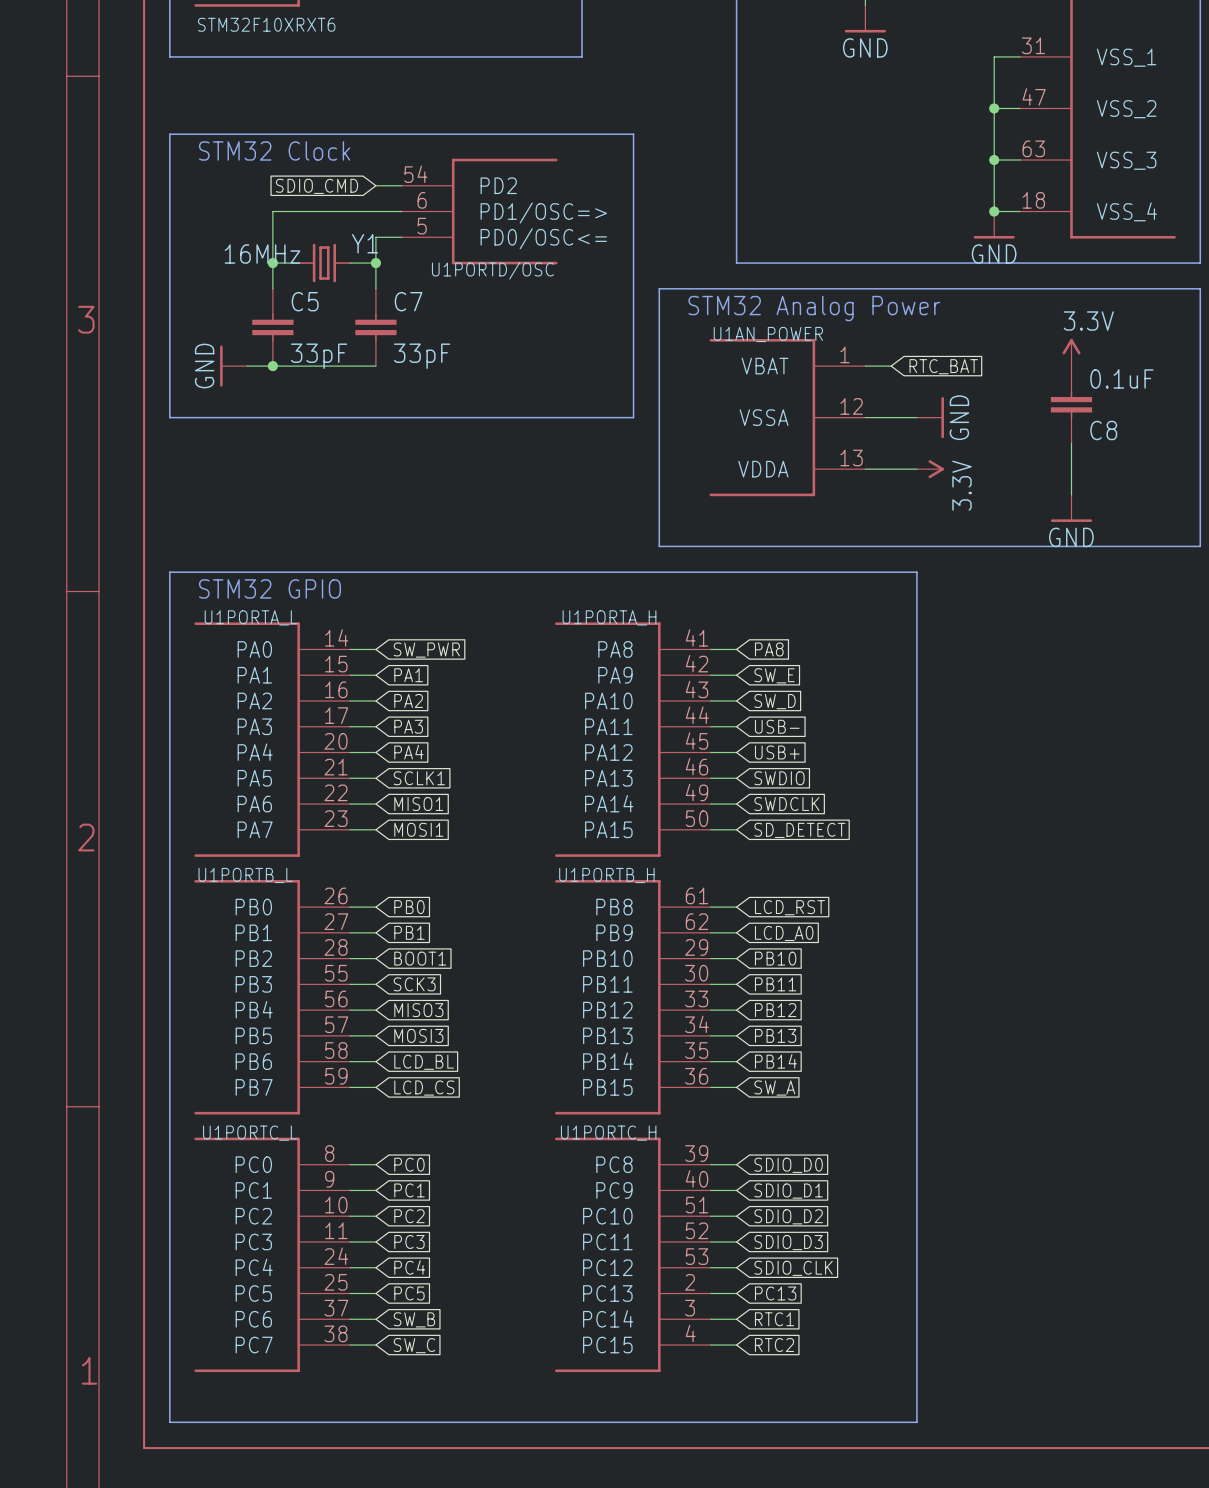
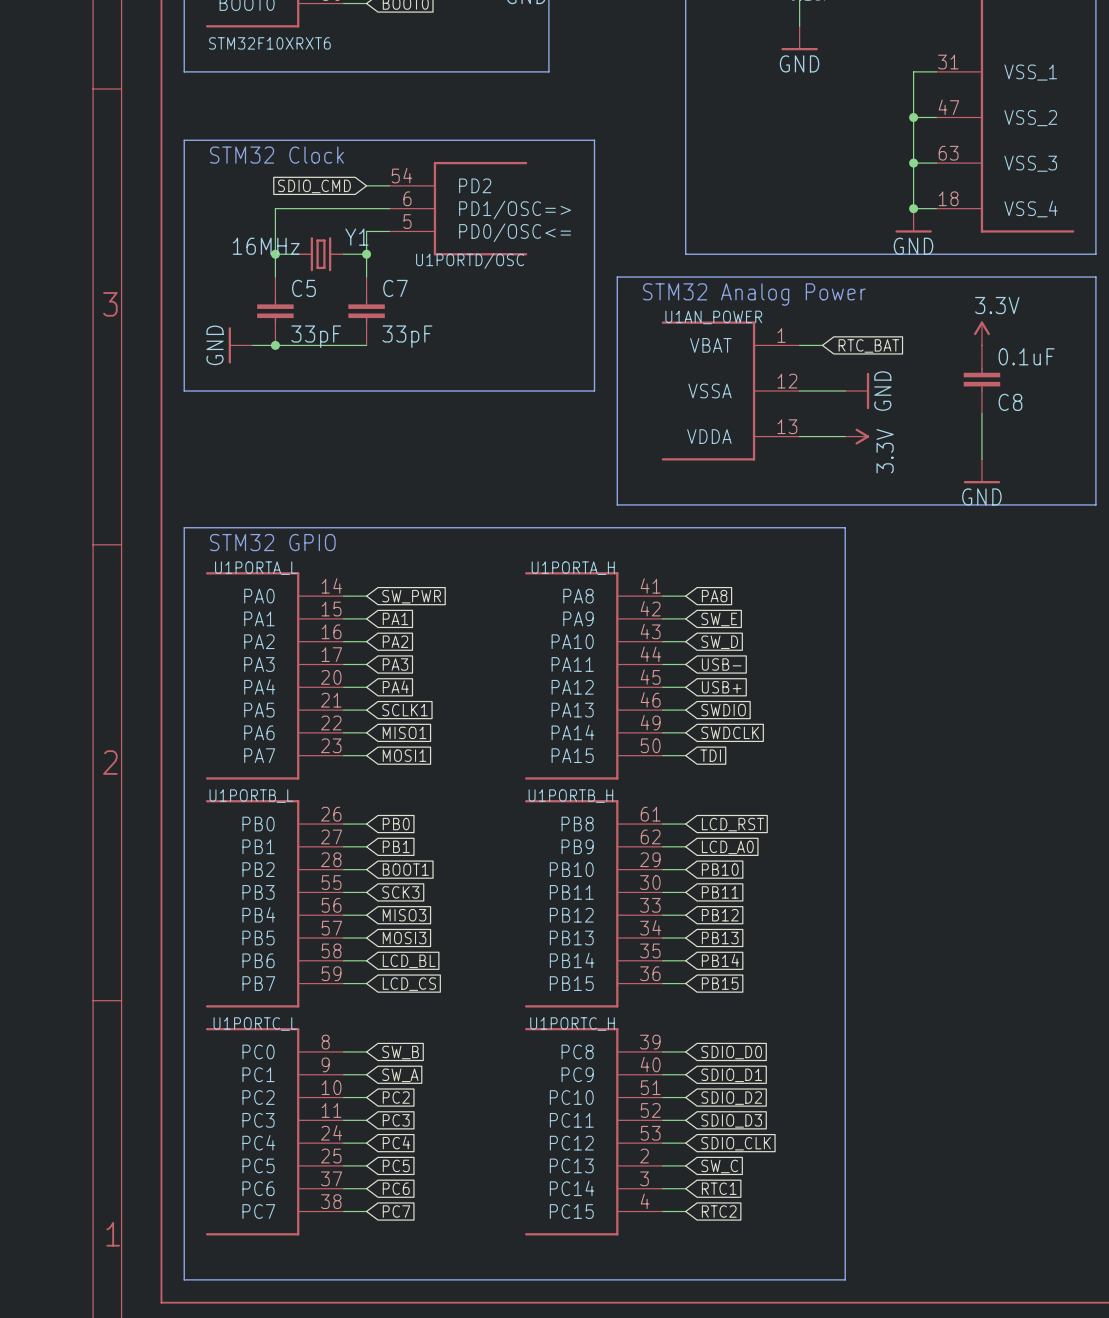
global label: SD_DETECT (799, 830) -> TDI (710, 755)
global label: SW_A (774, 1088) -> PB15 (720, 983)
global label: PC0 (409, 1164) -> SW_B (400, 1052)
global label: PC1 (409, 1190) -> SW_A (400, 1075)
global label: PC13 (775, 1293) -> SW_C (719, 1166)
global label: SW_B (414, 1319) -> PC6 (396, 1188)
global label: SW_C (414, 1345) -> PC7 (396, 1211)

